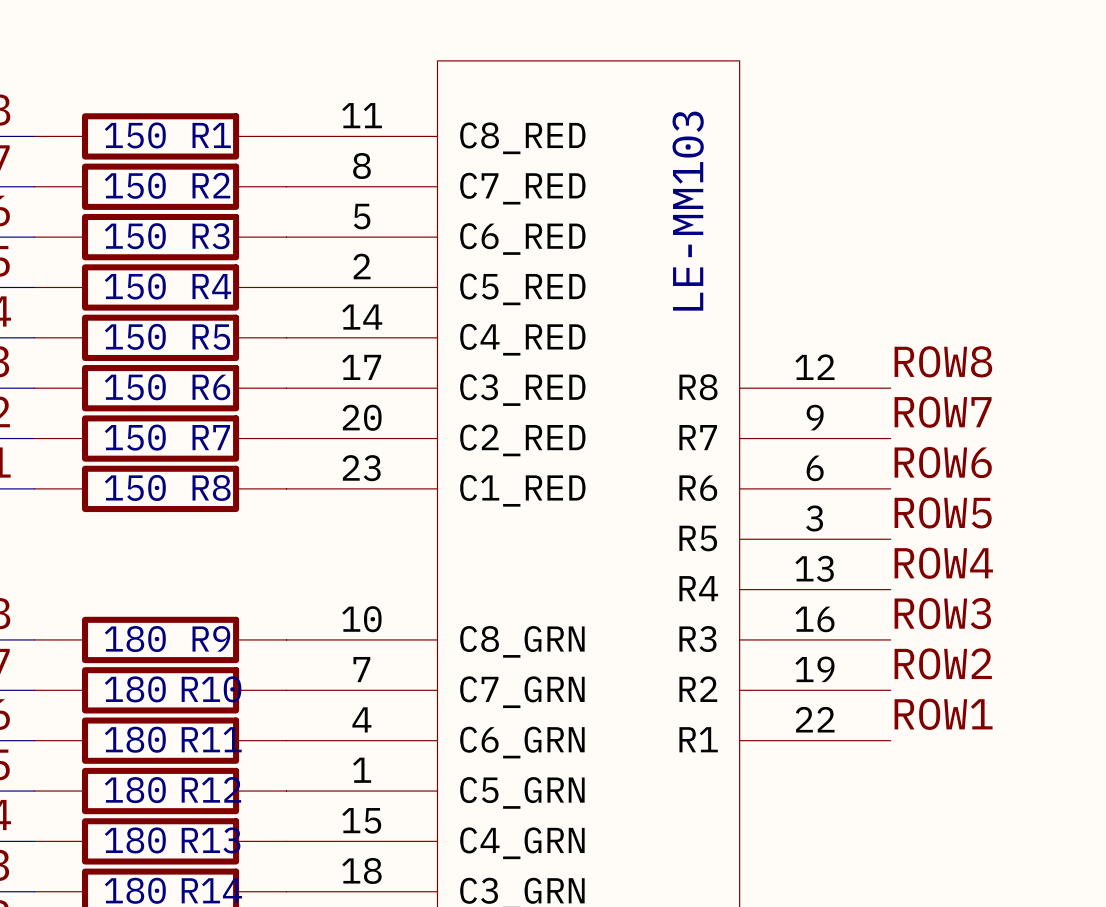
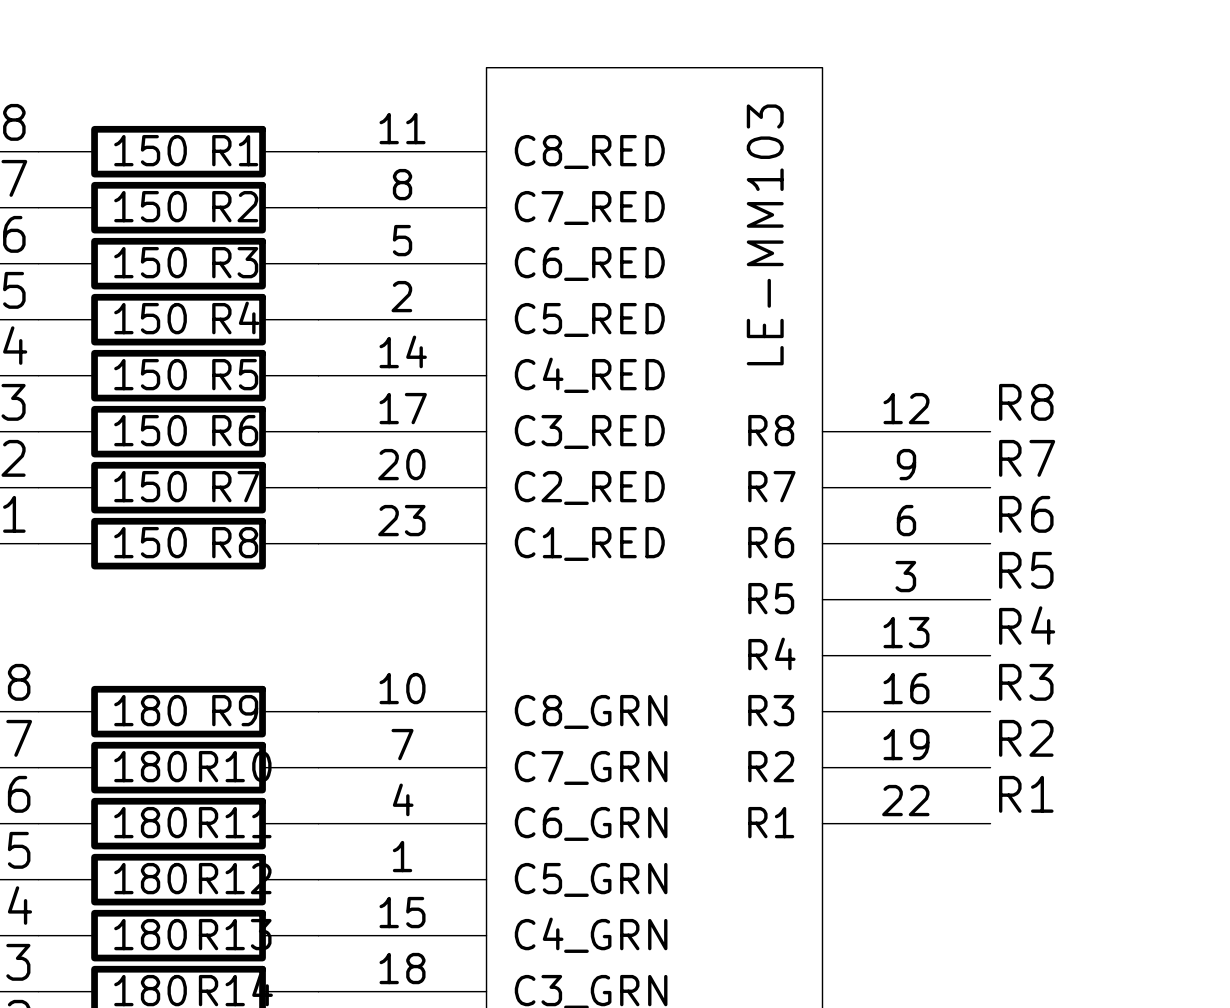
label: ROW8 (943, 361) -> R8 (1026, 402)
label: ROW7 (943, 412) -> R7 (1027, 458)
label: ROW6 (943, 462) -> R6 (1026, 514)
label: ROW5 (943, 512) -> R5 (1026, 570)
label: ROW4 (943, 563) -> R4 (1027, 625)
label: ROW3 (942, 613) -> R3 (1026, 682)
label: ROW2 (943, 663) -> R2 (1026, 738)
label: ROW1 (943, 714) -> R1 (1026, 794)

